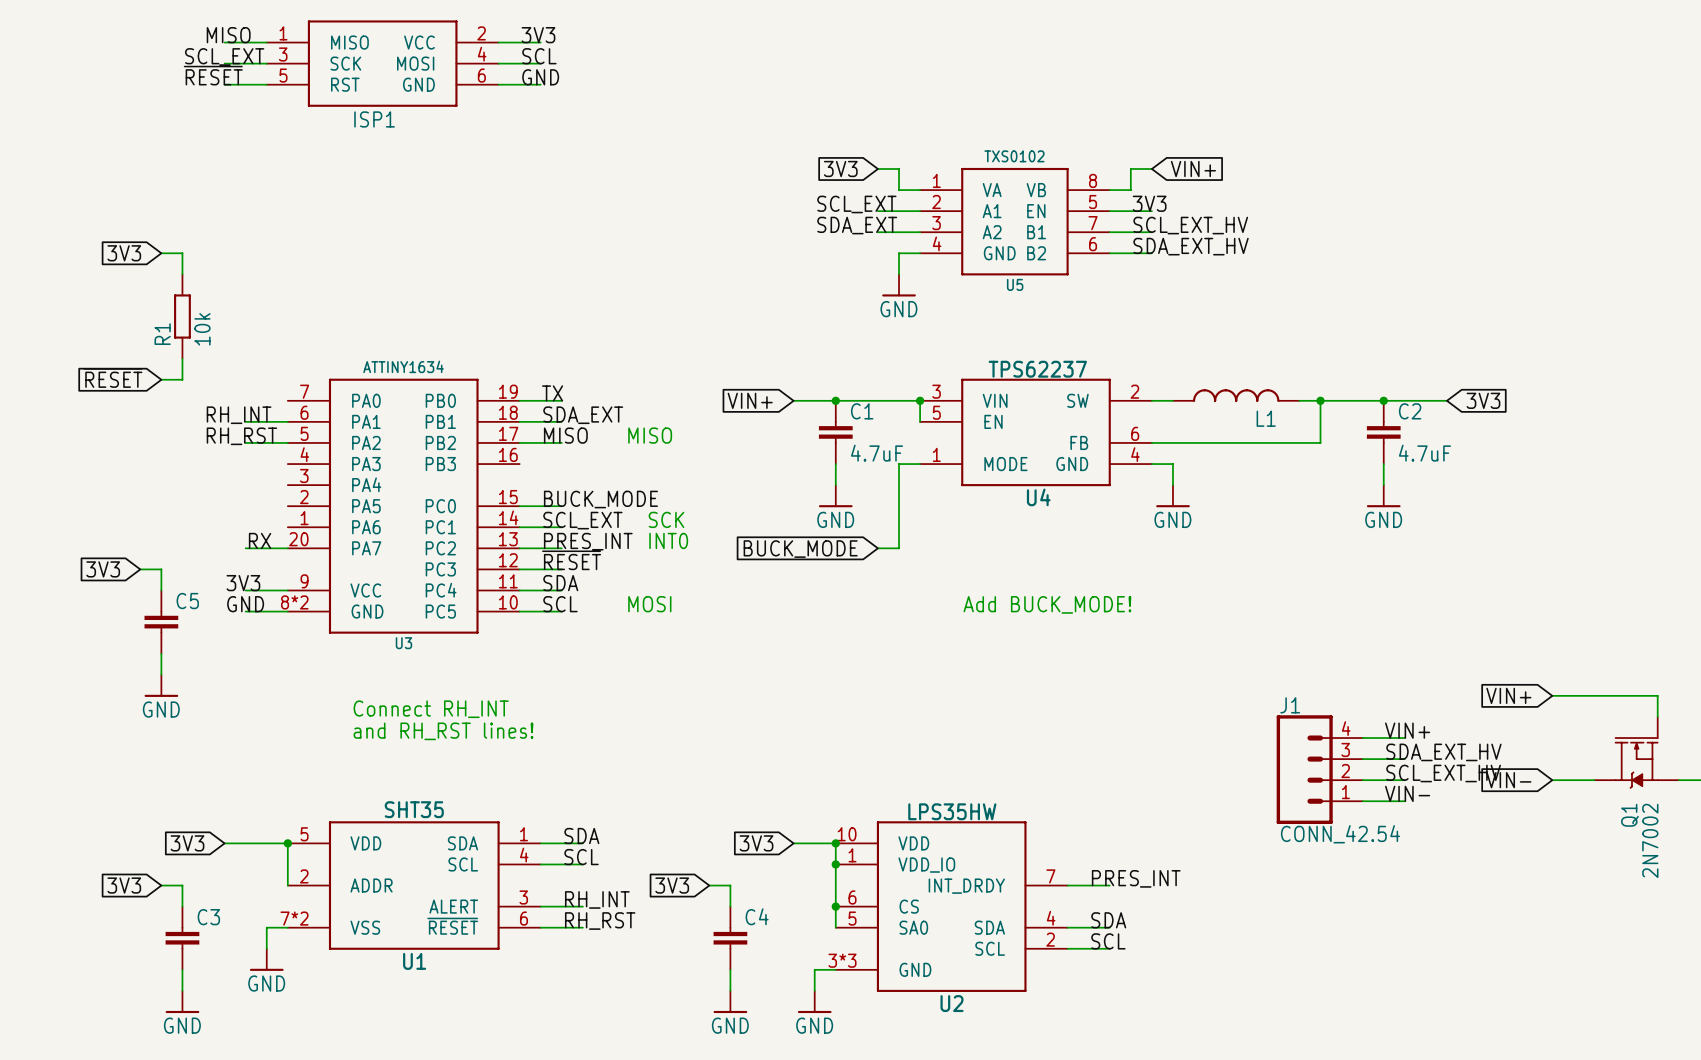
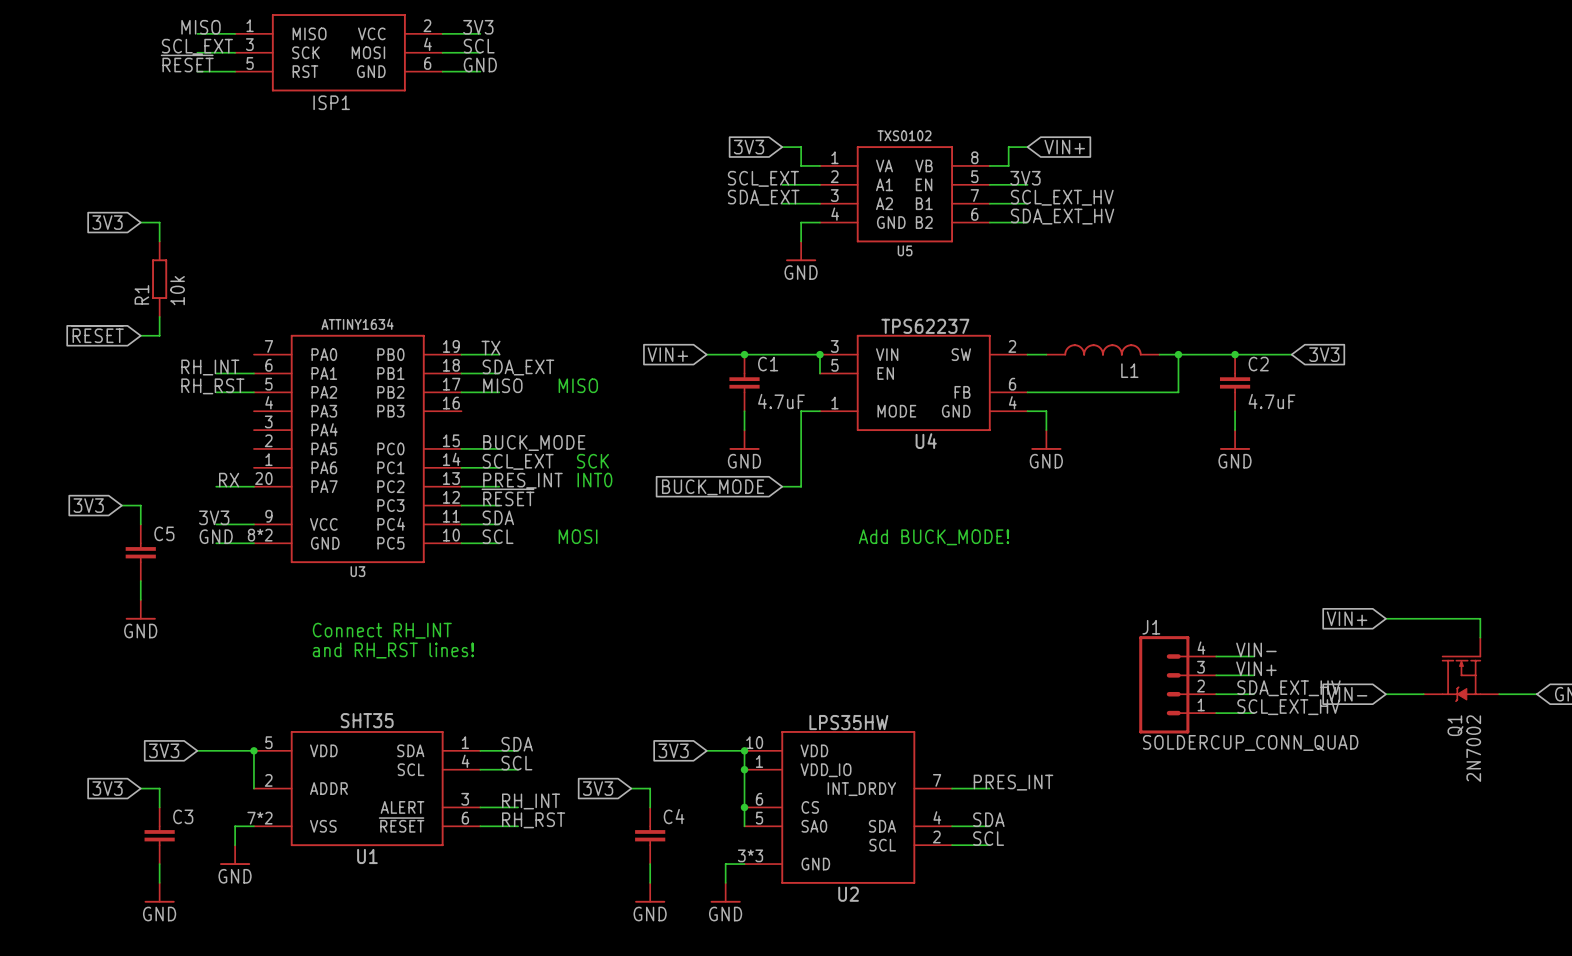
label: VIN+ (1407, 730) -> VIN- (1256, 649)
label: SDA_EXT_HV (1443, 752) -> VIN+ (1256, 668)
label: SCL_EXT_HV (1443, 773) -> SDA_EXT_HV (1288, 688)
label: VIN- (1407, 793) -> SCL_EXT_HV (1288, 707)
J1 value: CONN_42.54 (1340, 834) -> SOLDERCUP_CONN_QUAD (1250, 742)

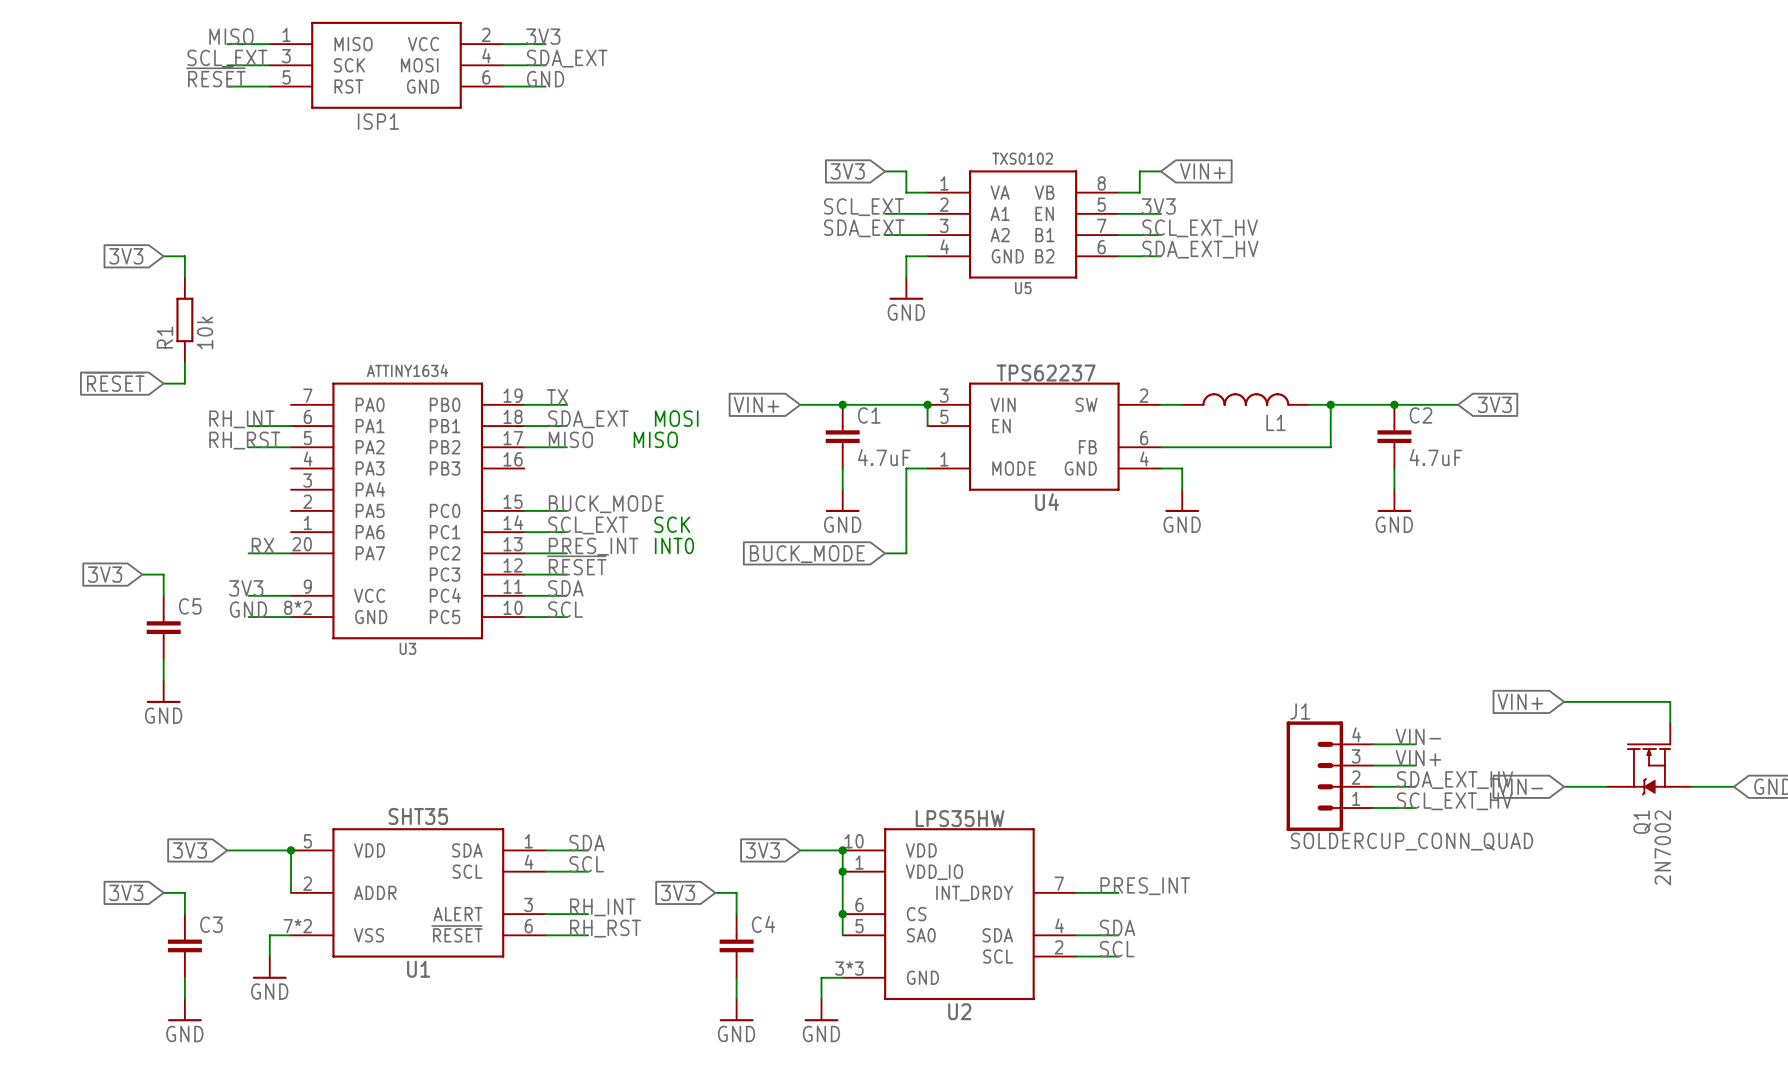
label: SCL (479, 46) -> SDA_EXT (567, 58)
text position: MOSI (578, 536) -> MOSI (676, 418)
text: Add BUCK_MODE! (933, 537) -> none
text: Connect RH_INT (382, 630) -> none
text: and RH_RST lines! (393, 650) -> none

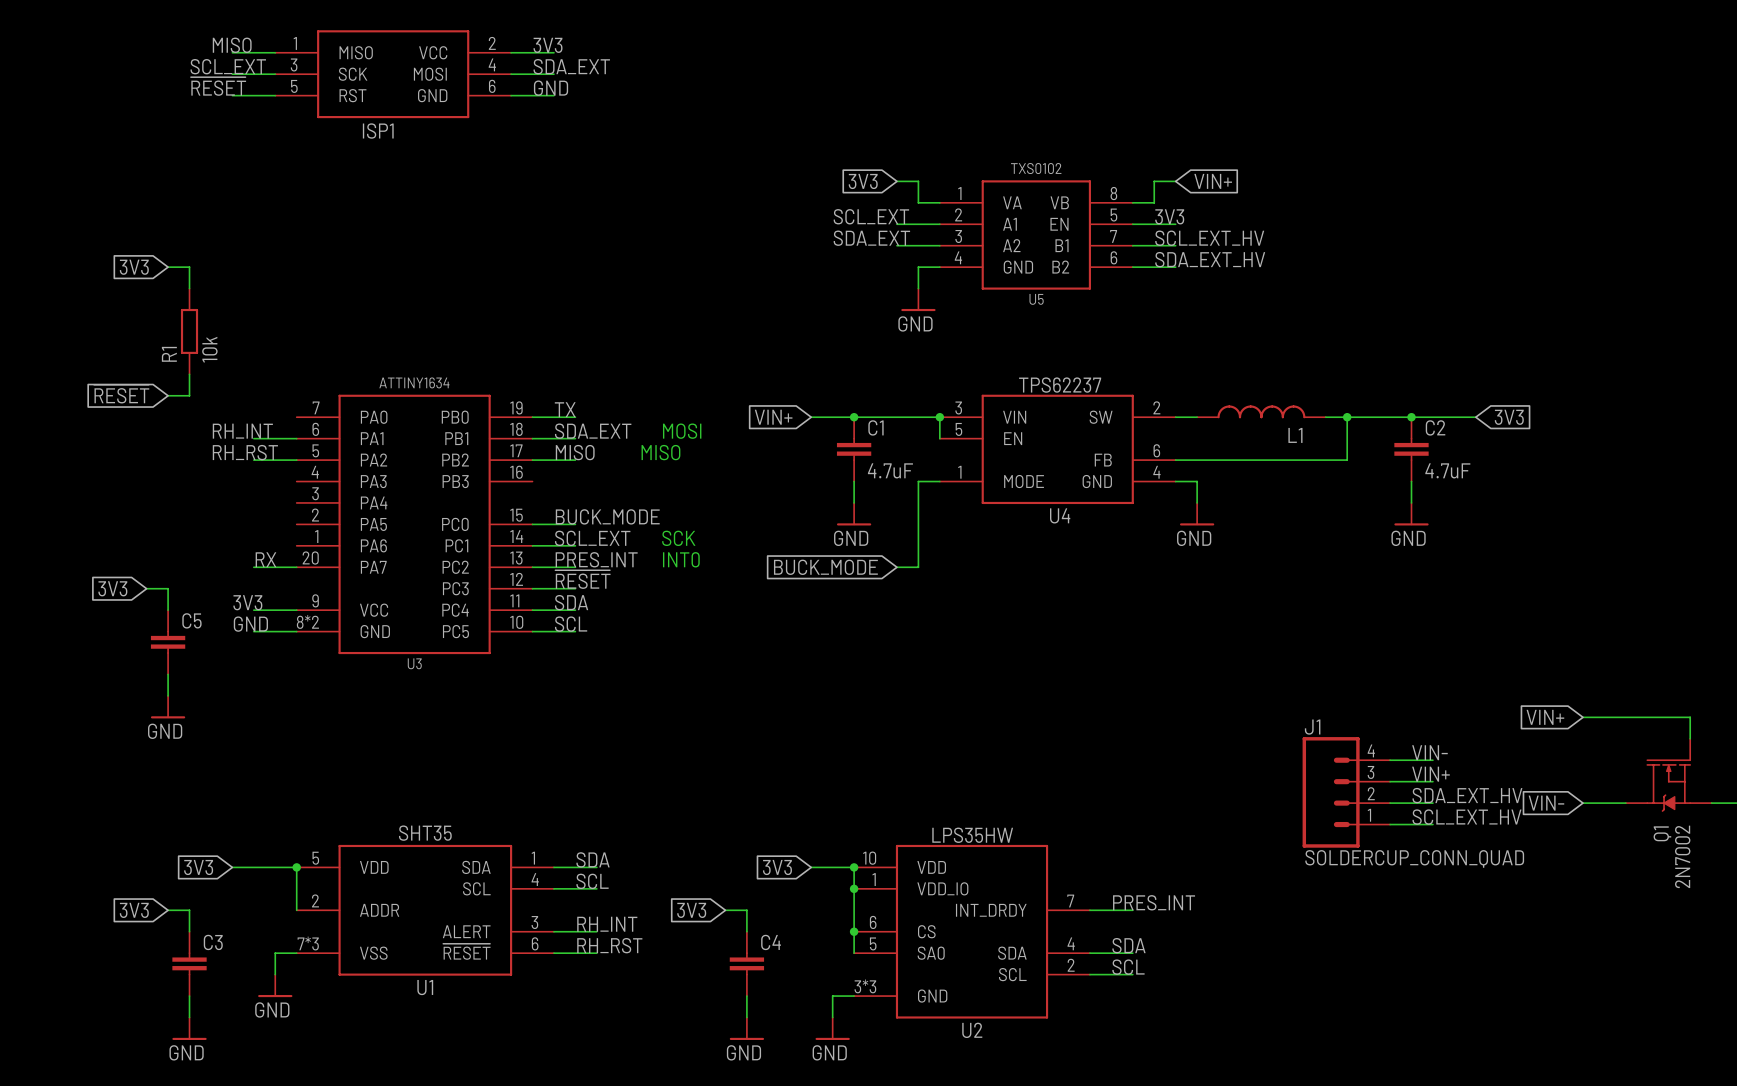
U1 pin number: 7*2 (297, 926) -> 7*3 (308, 943)

